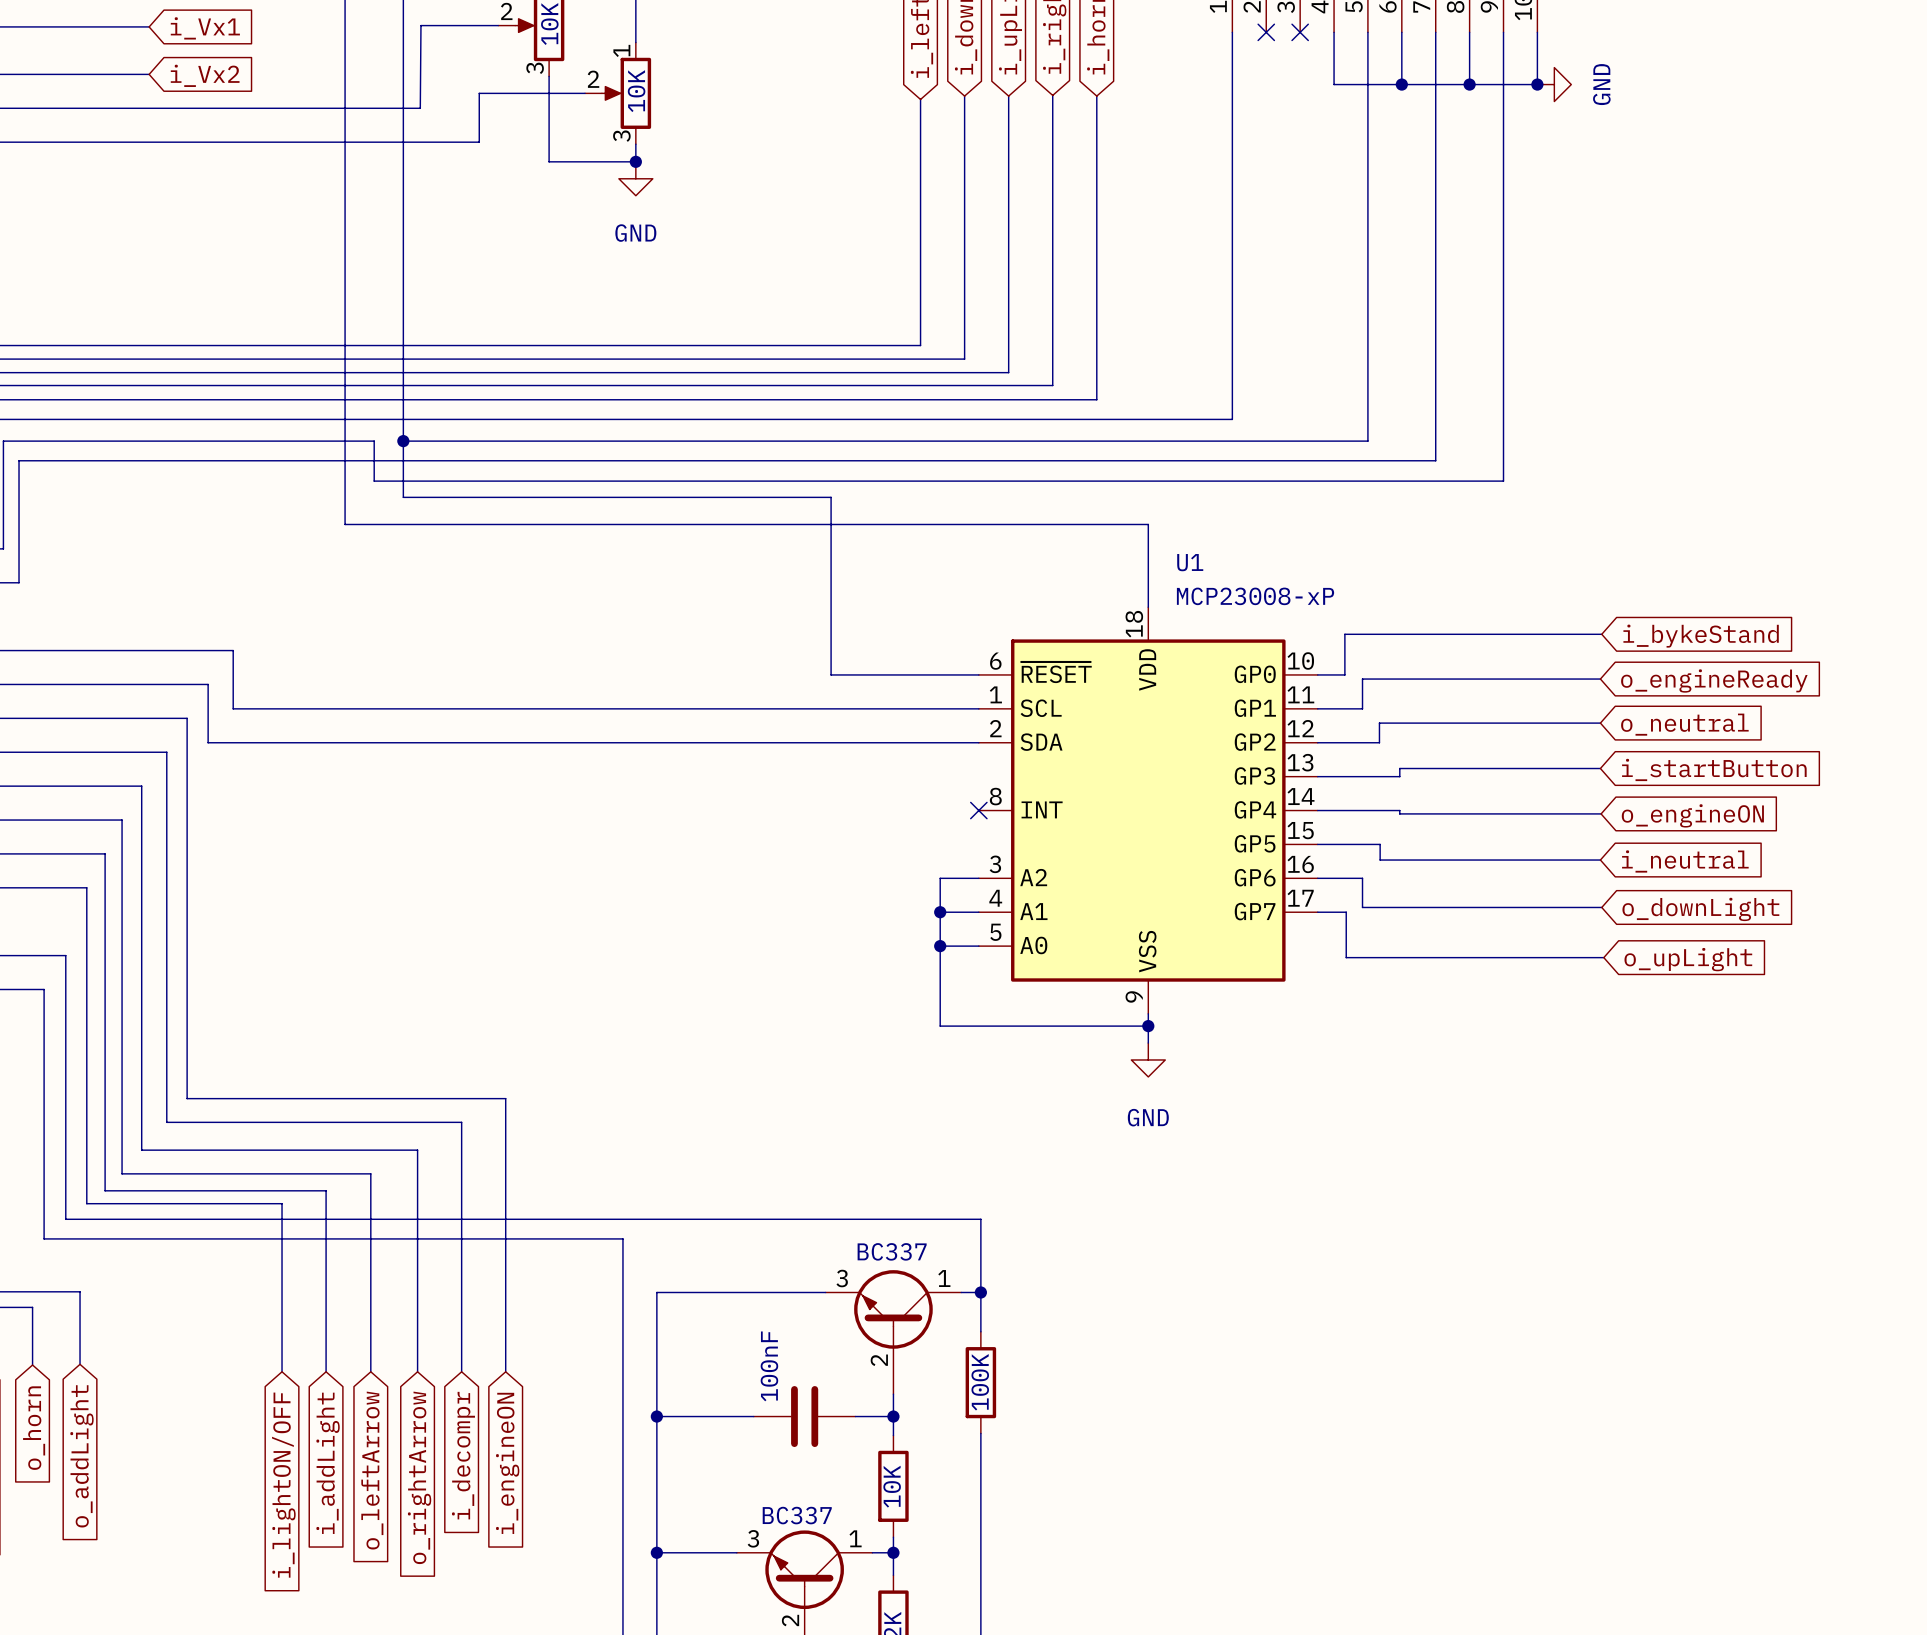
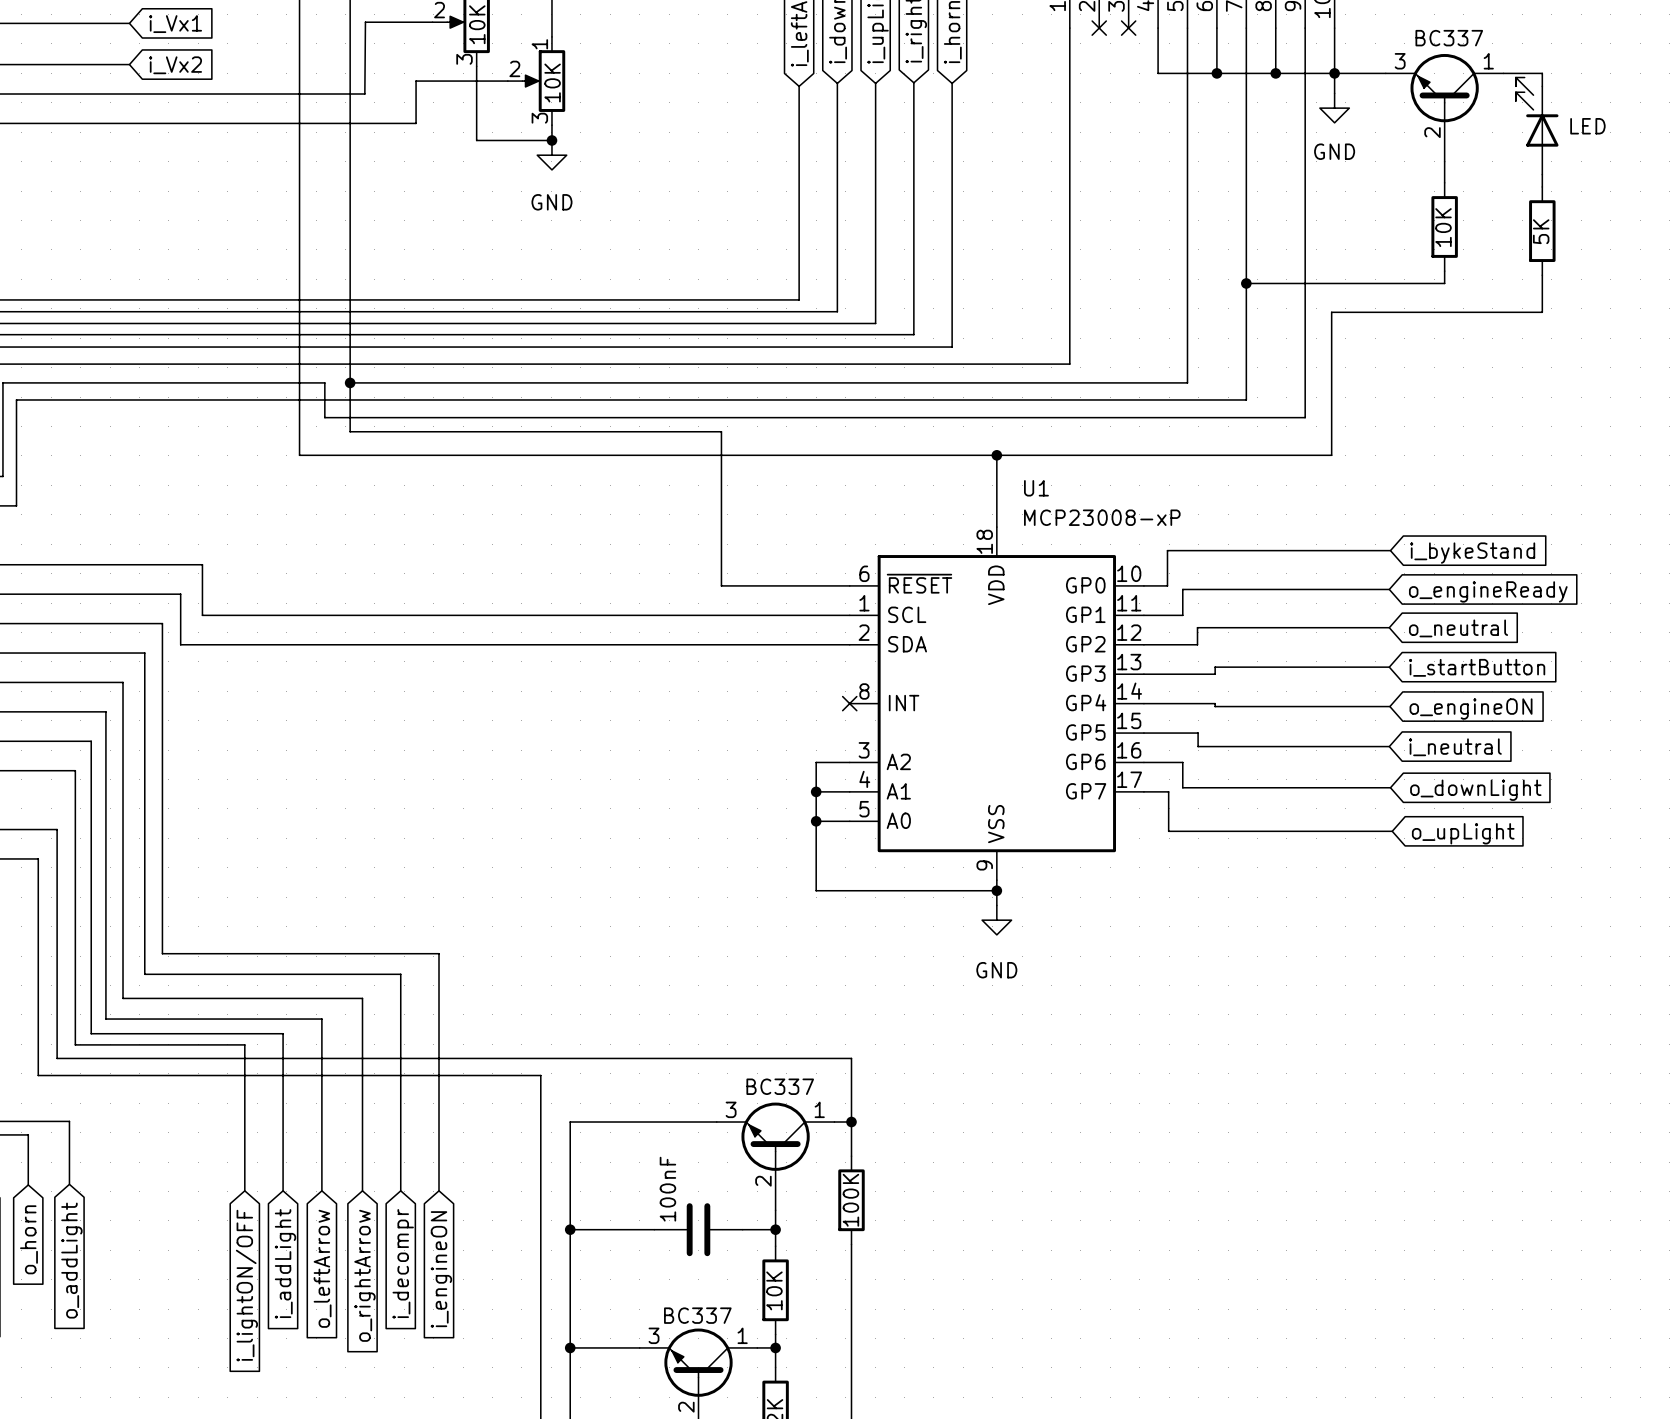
power symbol rotation: 0° (1554, 84) -> 90° clockwise (1334, 108)
power symbol position: GND (1554, 84) -> GND (1334, 108)
wire: none -> (1385, 73) (1334, 73) (1334, 93)
wire: none -> (1503, 73) (1542, 73) (1542, 86)
part: none -> BC337 (1444, 107)
part: none -> LED (1537, 126)
wire: none -> (1444, 161) (1444, 182)
wire: none -> (1542, 174) (1542, 186)
part: none -> 10K (1444, 226)
part: none -> 5K (1542, 231)
wire: none -> (1444, 271) (1444, 283) (1246, 283)
wire: none -> (1542, 275) (1542, 312) (1331, 312) (1331, 455) (996, 455)
junction: none -> (1246, 283)
junction: none -> (996, 455)

